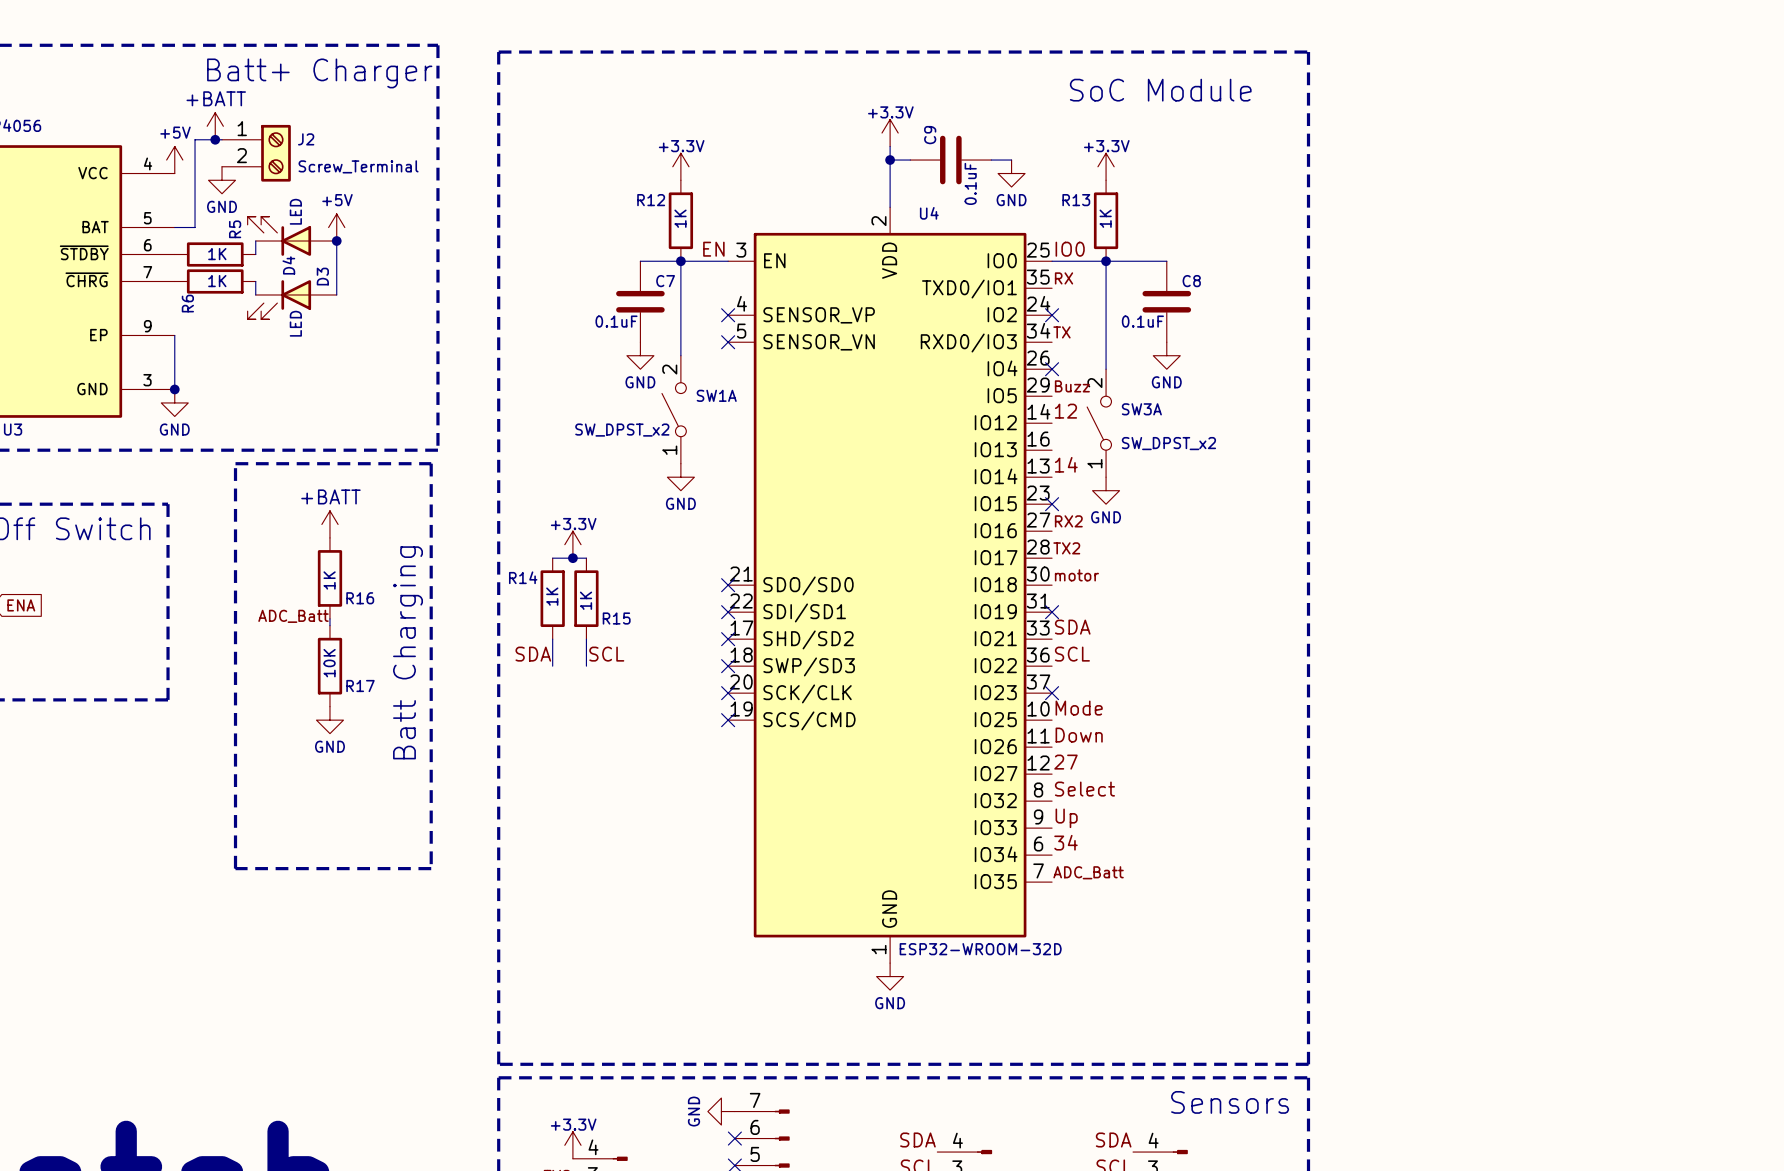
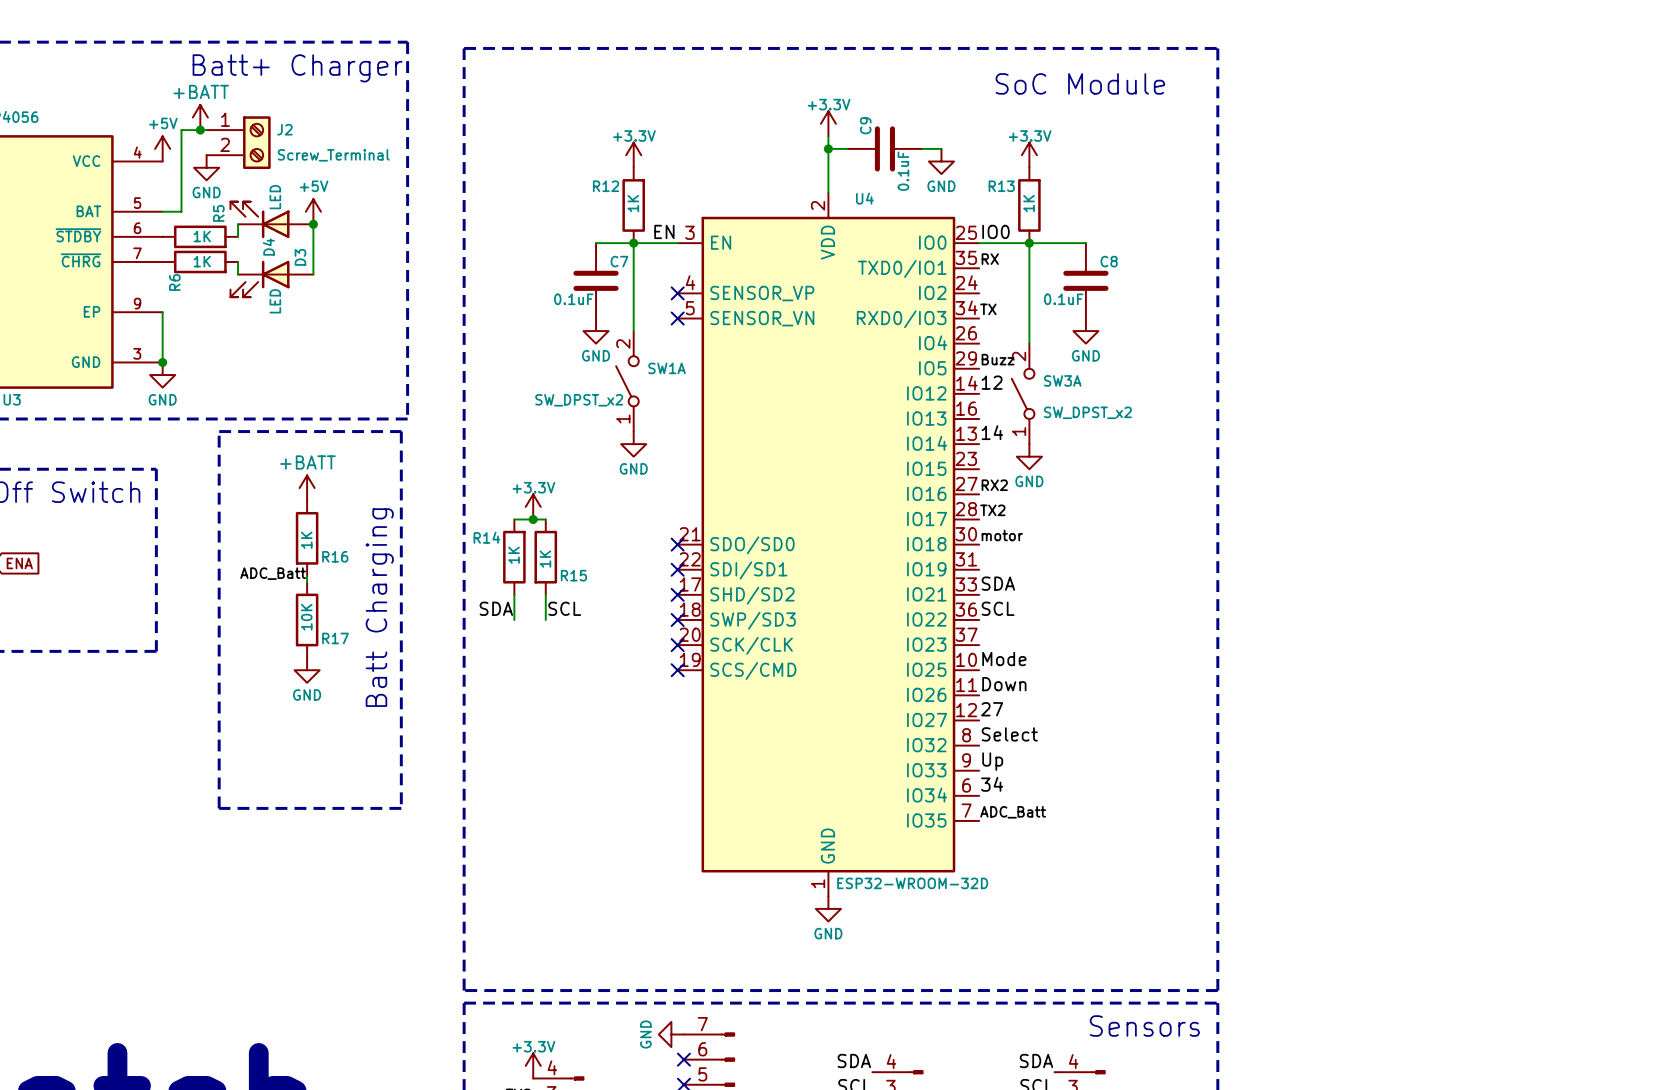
no-connect mark: (1052, 315) -> none
no-connect mark: (1052, 369) -> none
no-connect mark: (1052, 504) -> none
no-connect mark: (1052, 612) -> none
no-connect mark: (1052, 693) -> none

